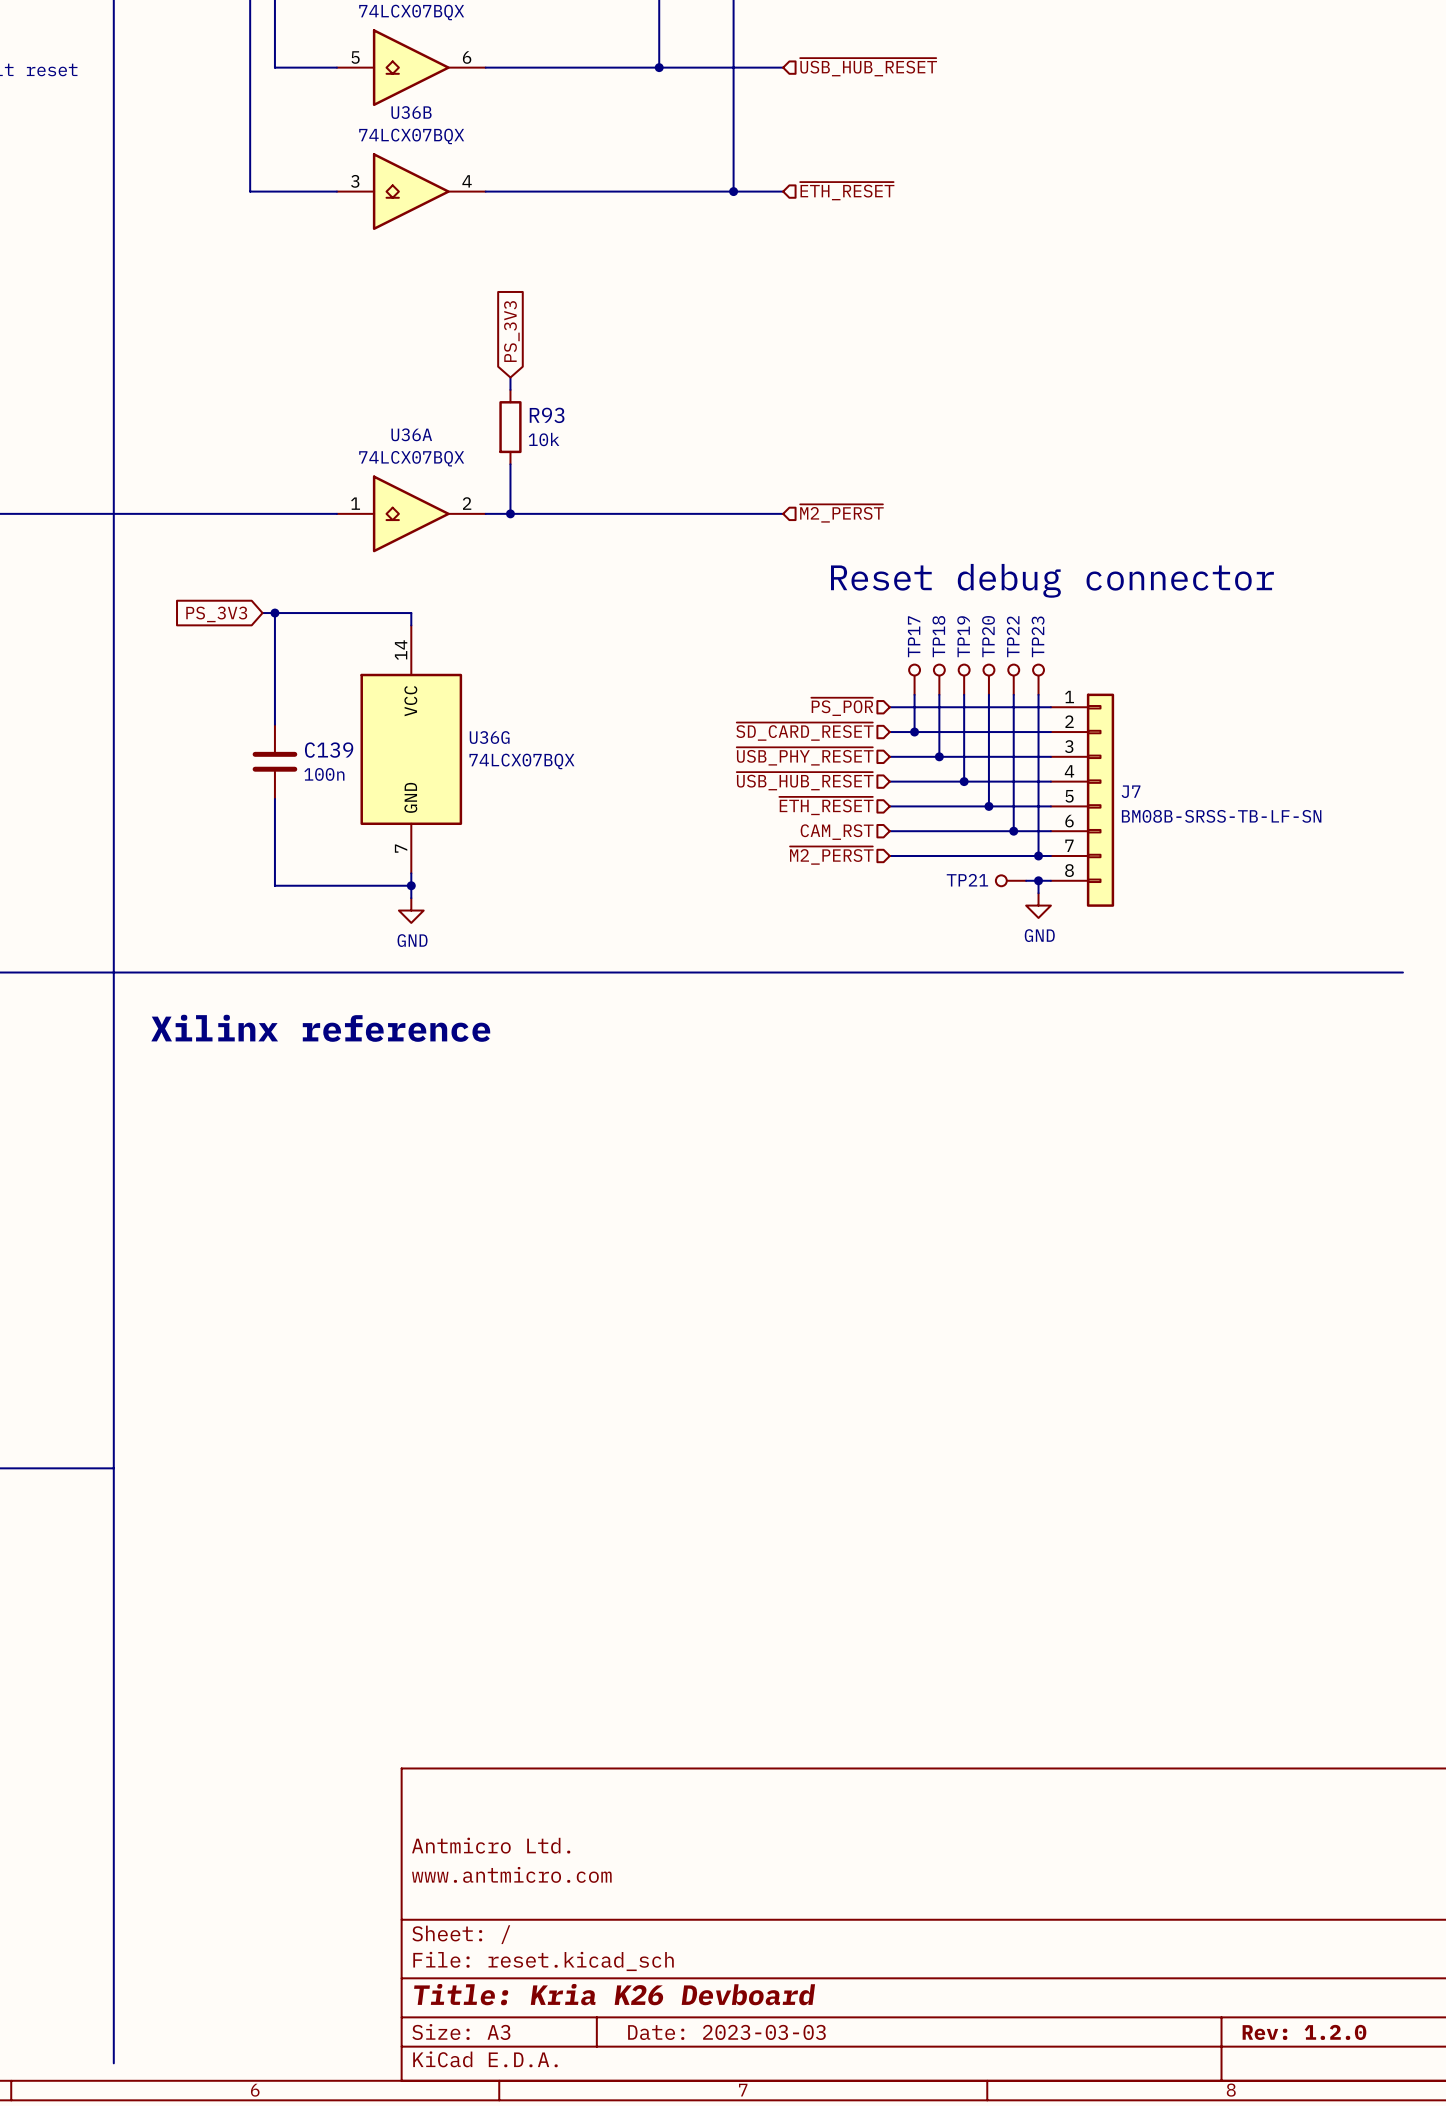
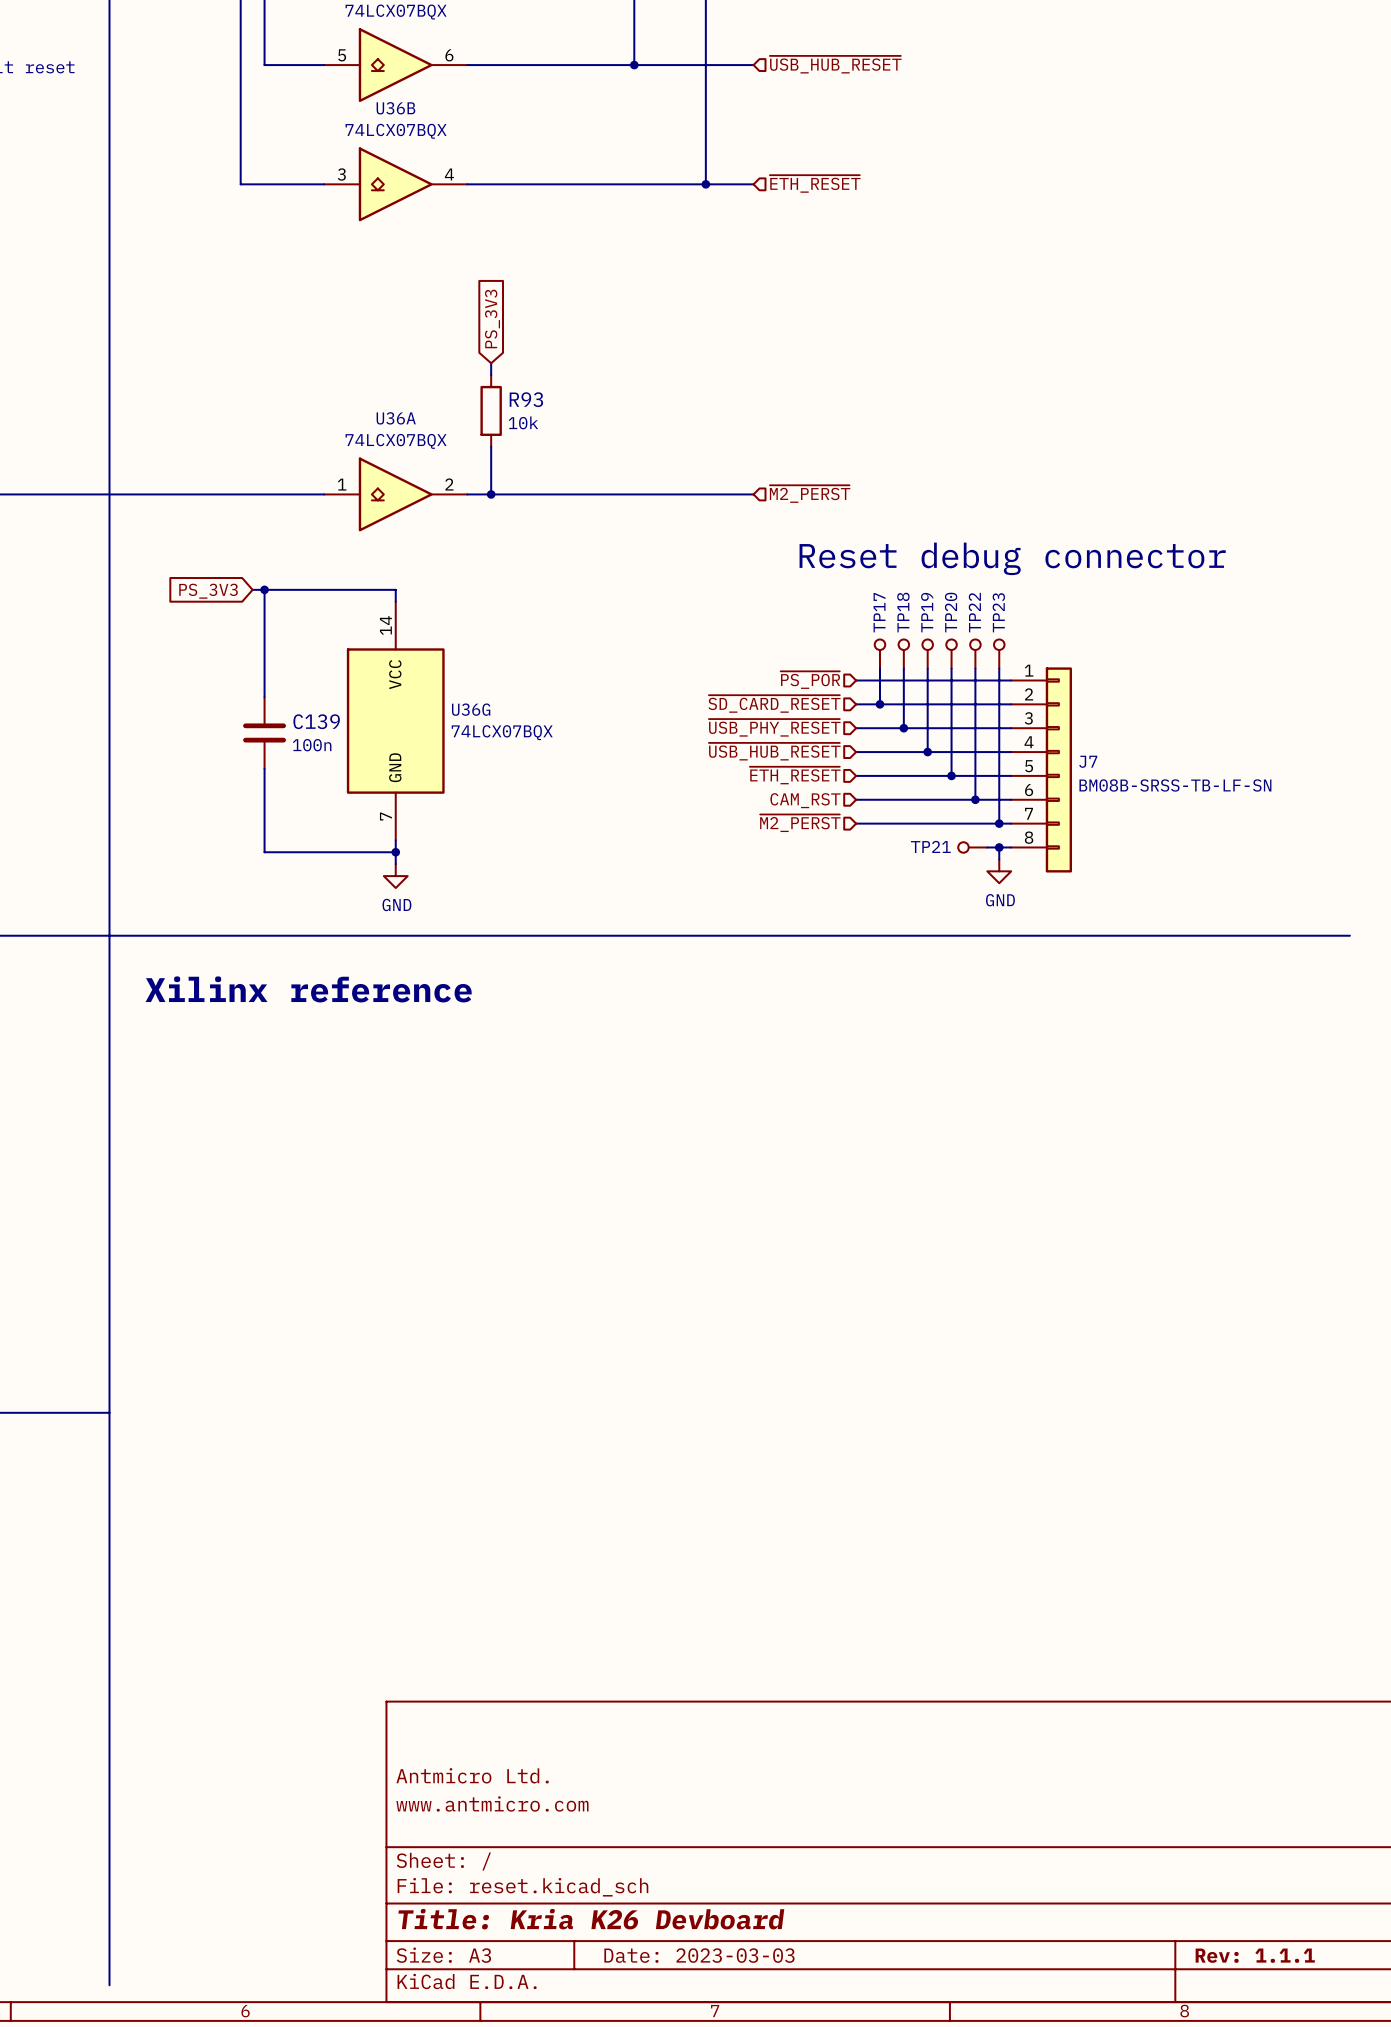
title block: Rev: 1.2.0 (1304, 2032) -> Rev: 1.1.1 (1255, 1955)

